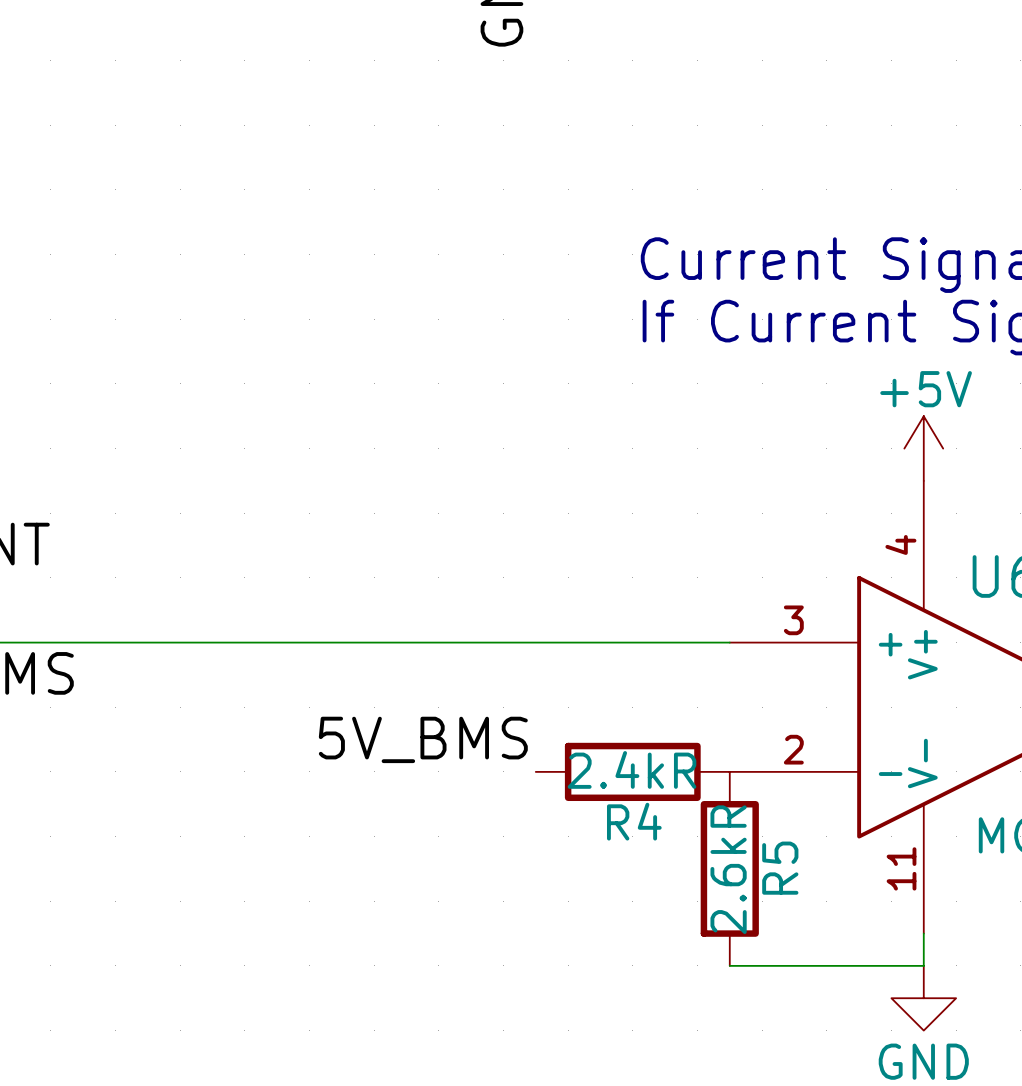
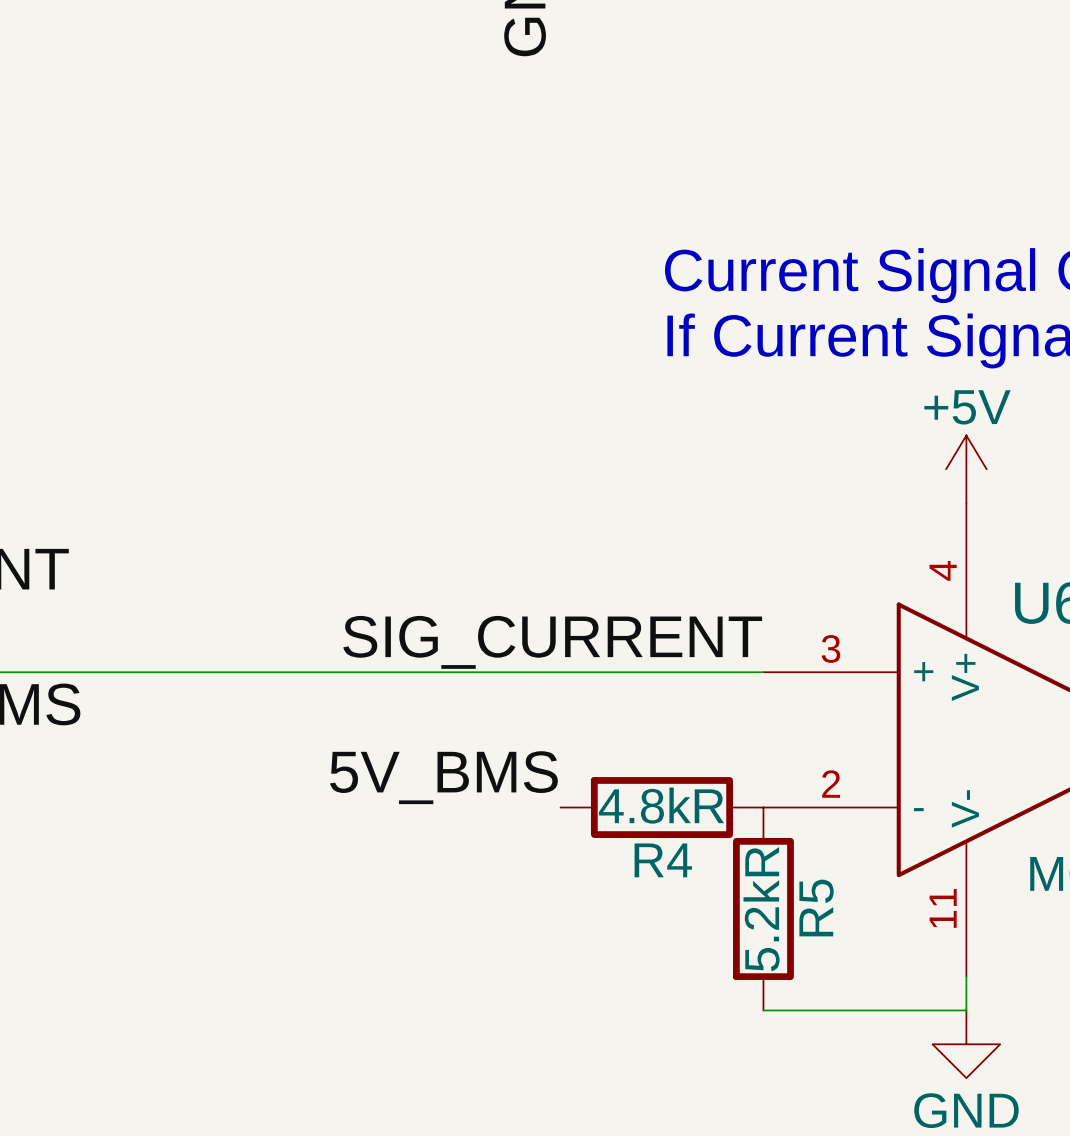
label: none -> SIG_CURRENT (552, 642)
R4 value: 2.4kR (632, 769) -> 4.8kR (661, 805)
R5 value: 2.6kR (728, 869) -> 5.2kR (761, 909)

